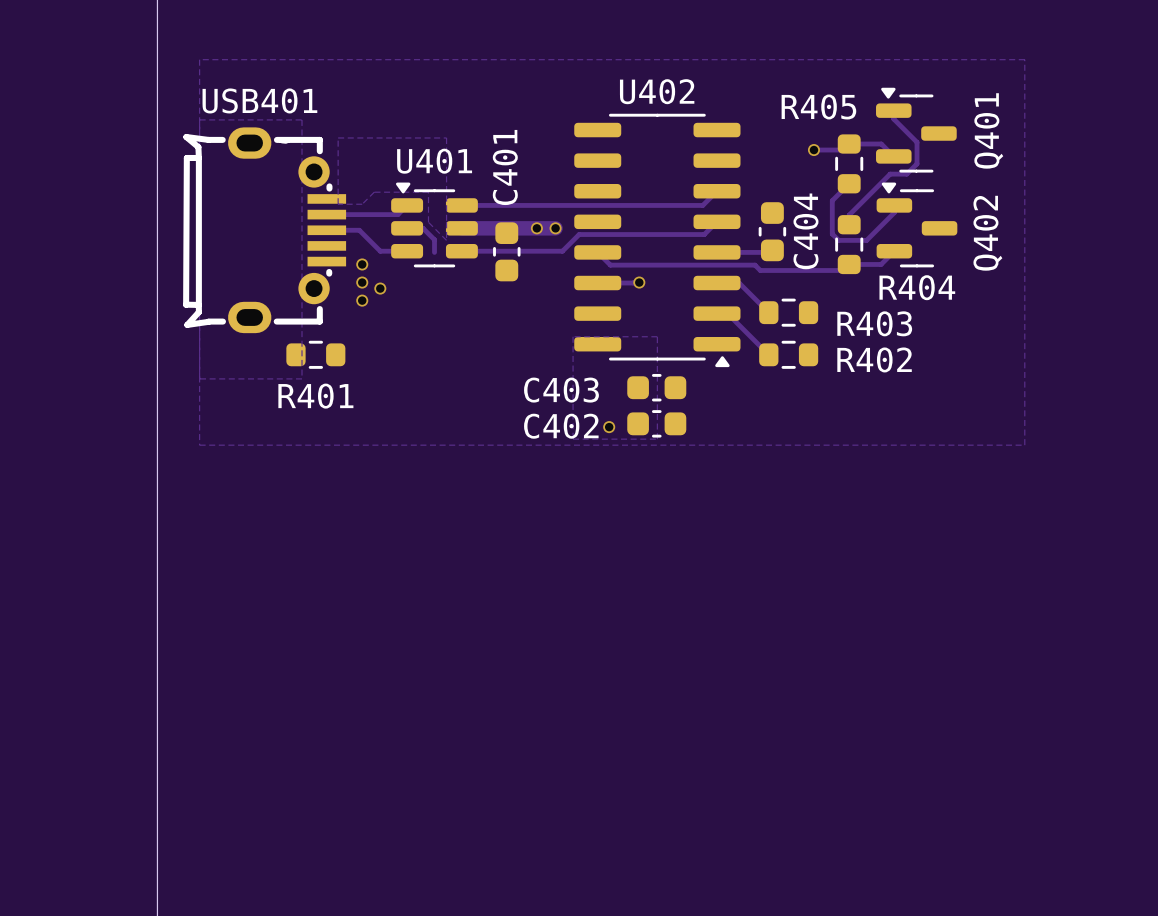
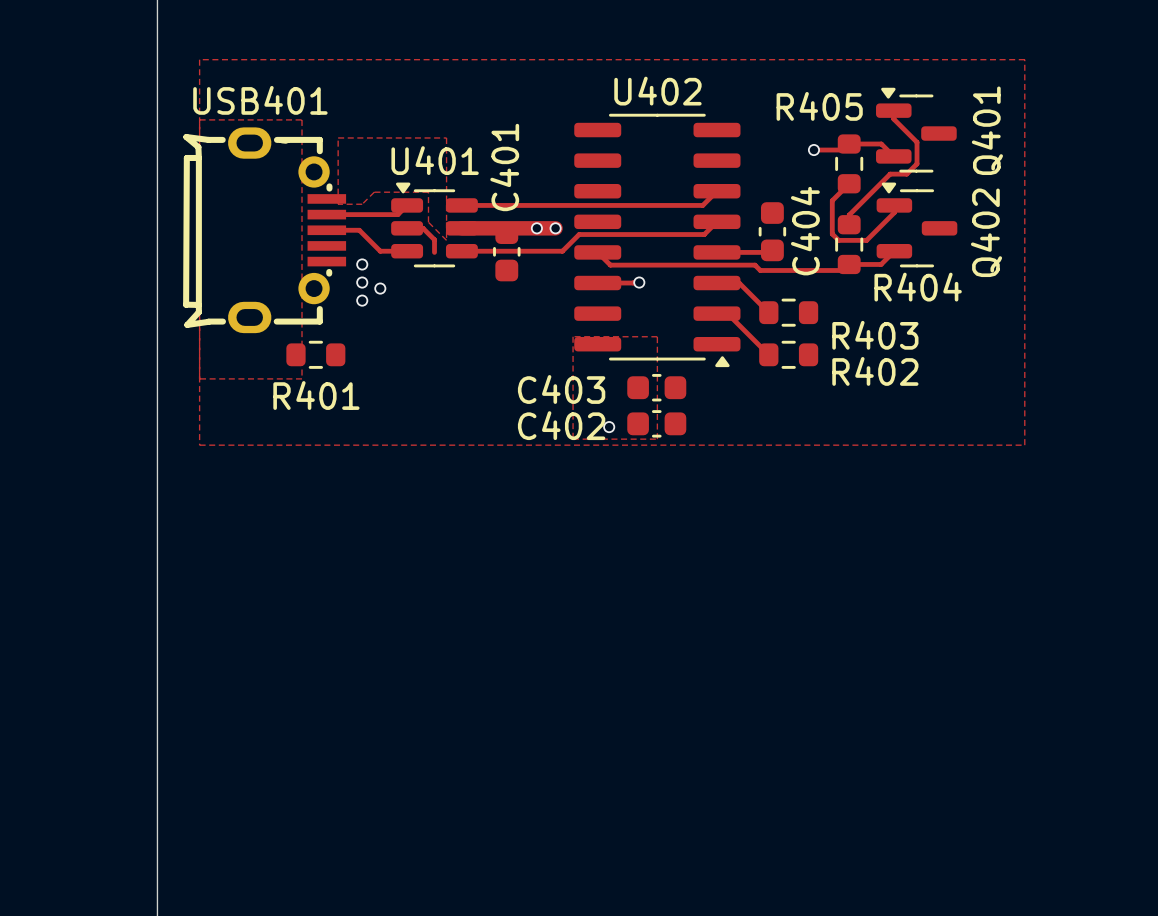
R403 name position: R403 (874, 323) -> R403 (875, 335)
R402 name position: R402 (874, 359) -> R402 (875, 371)

